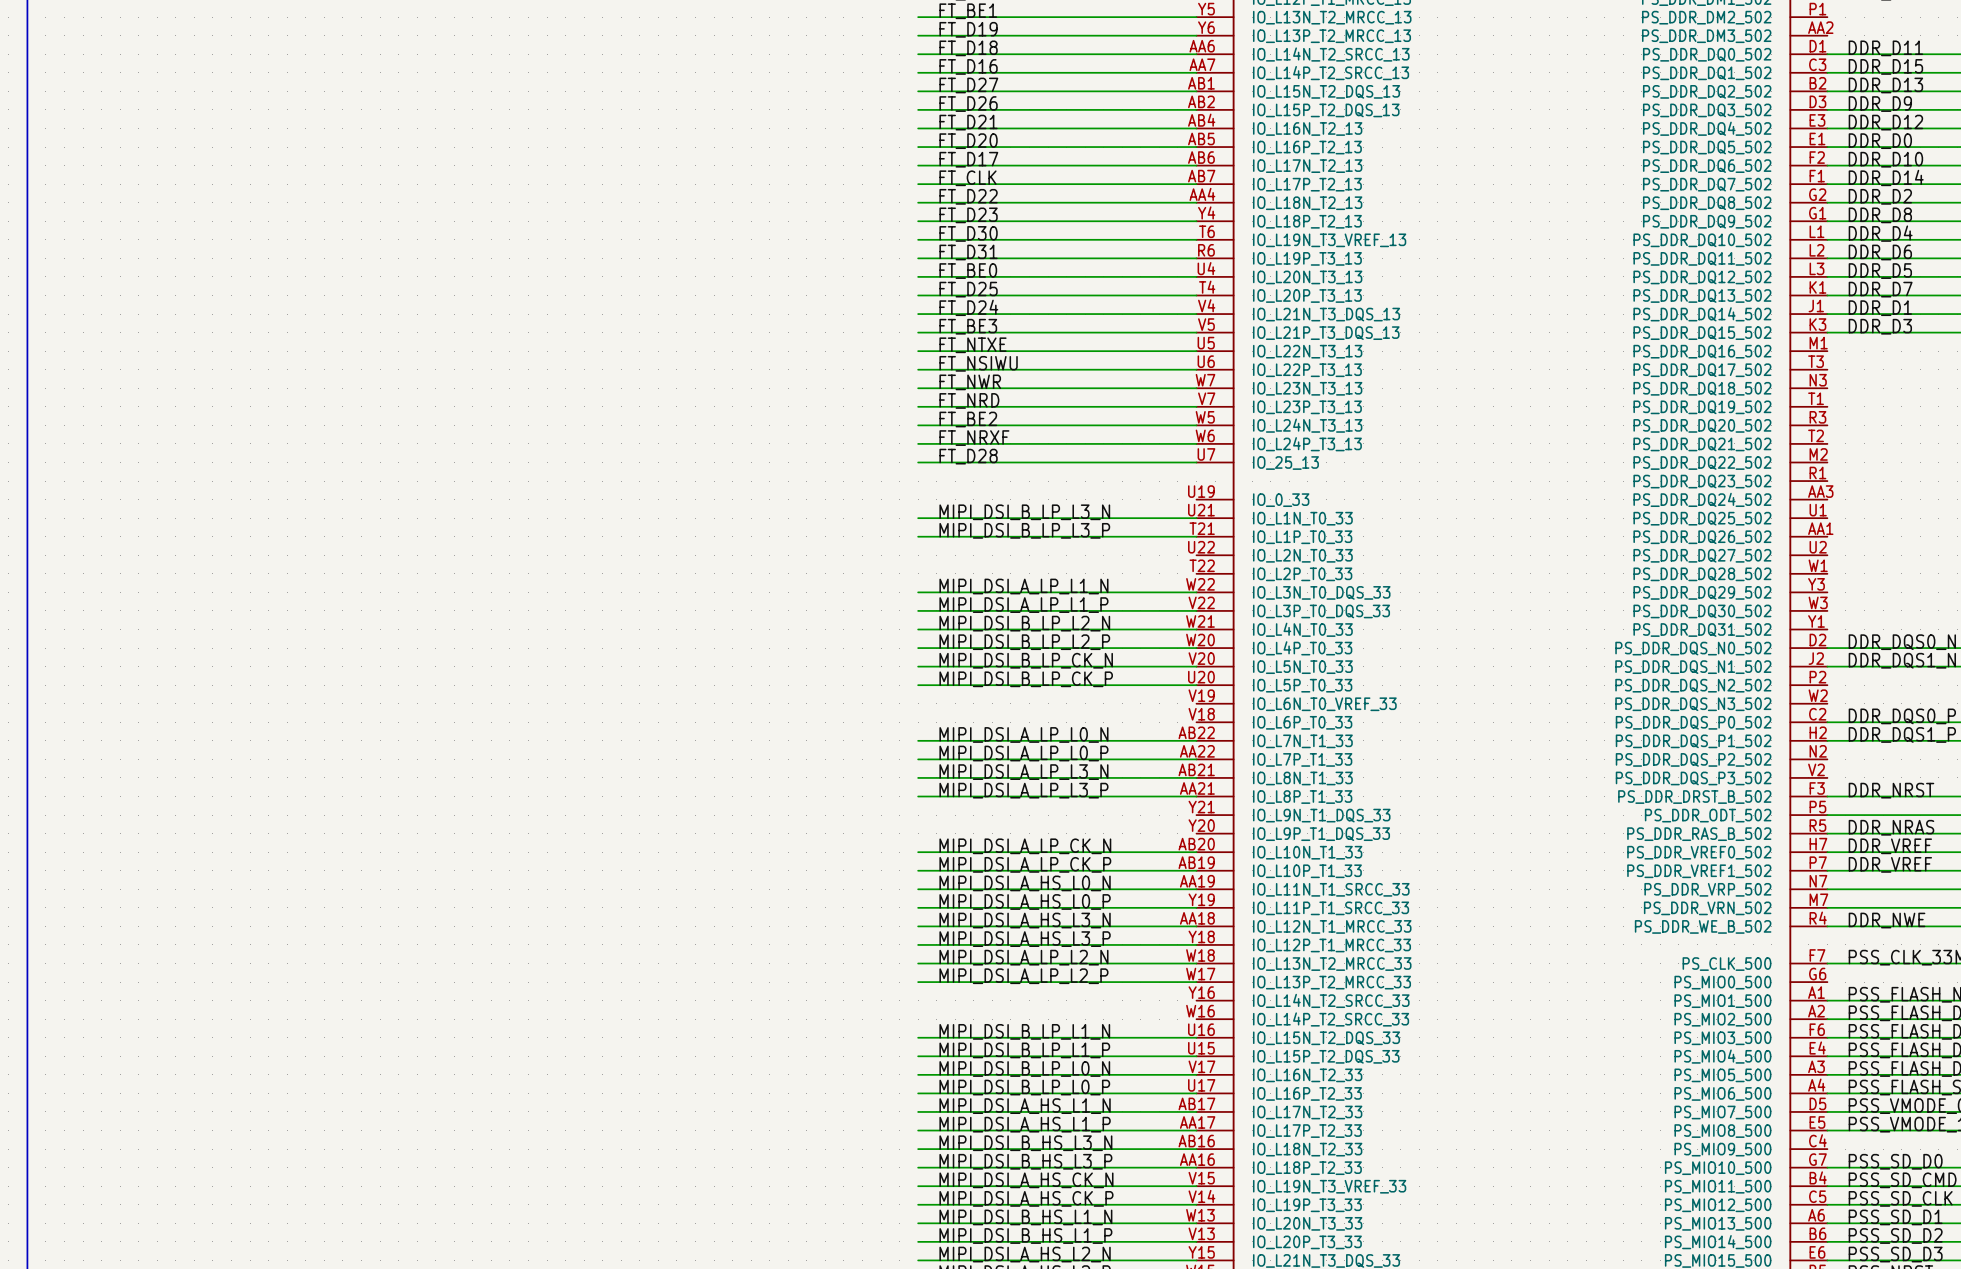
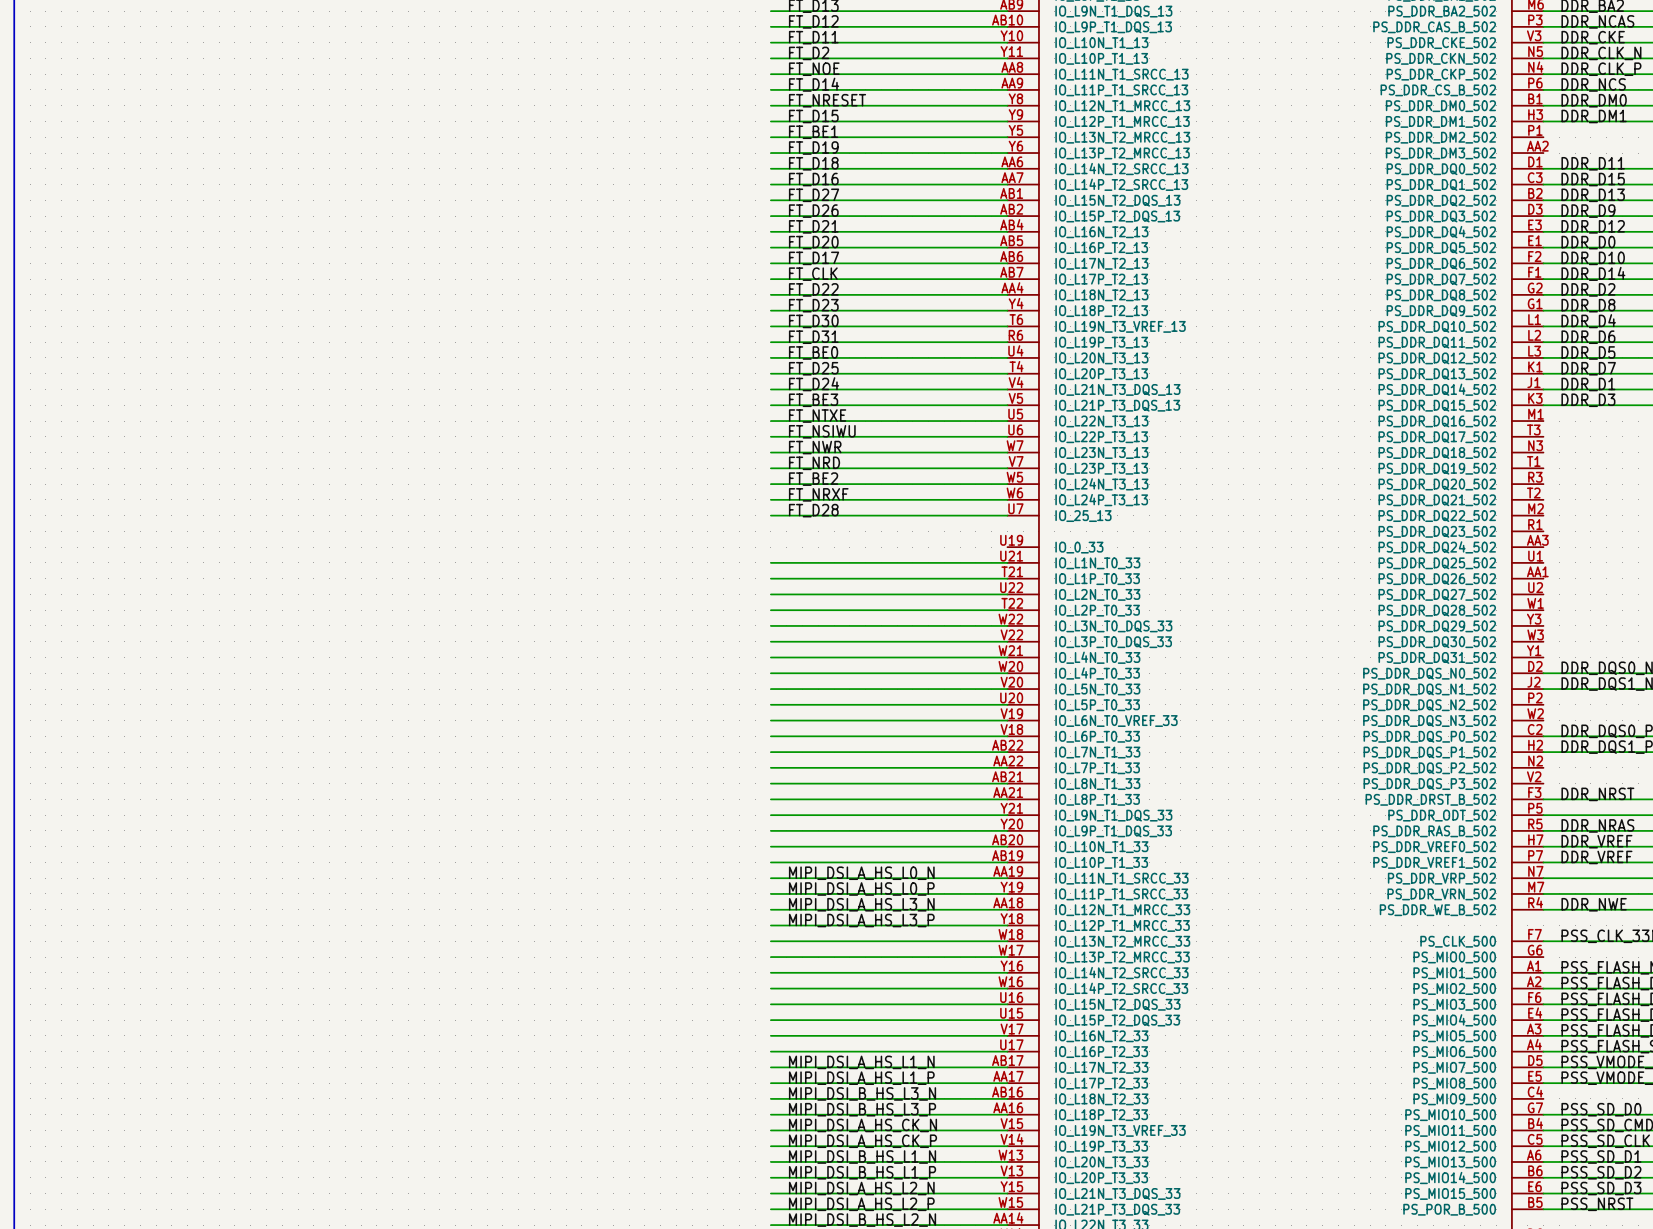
label: MIPI_DSI_B_LP_L3_N (1024, 512) -> none
label: MIPI_DSI_B_LP_L3_P (1024, 530) -> none
wire: none -> (770, 594) (1007, 594)
wire: none -> (770, 610) (1007, 610)
label: MIPI_DSI_A_LP_L1_N (1023, 586) -> none
label: MIPI_DSI_A_LP_L1_P (1023, 605) -> none
label: MIPI_DSI_B_LP_L2_N (1024, 623) -> none
label: MIPI_DSI_B_LP_L2_P (1024, 642) -> none
label: MIPI_DSI_B_LP_CK_N (1026, 660) -> none
label: MIPI_DSI_B_LP_CK_P (1026, 679) -> none
wire: none -> (770, 720) (1007, 720)
wire: none -> (770, 736) (1007, 736)
label: MIPI_DSI_A_LP_L0_N (1023, 734) -> none
label: MIPI_DSI_A_LP_L0_P (1023, 753) -> none
label: MIPI_DSI_A_LP_L3_N (1023, 772) -> none
label: MIPI_DSI_A_LP_L3_P (1023, 790) -> none
wire: none -> (770, 815) (1007, 815)
wire: none -> (770, 830) (1007, 830)
label: MIPI_DSI_A_LP_CK_N (1025, 846) -> none
label: MIPI_DSI_A_LP_CK_P (1025, 864) -> none
label: MIPI_DSI_A_LP_L2_N (1023, 957) -> none
label: MIPI_DSI_A_LP_L2_P (1023, 976) -> none
wire: none -> (770, 972) (1007, 972)
wire: none -> (770, 988) (1007, 988)
label: MIPI_DSI_B_LP_L1_N (1024, 1031) -> none
label: MIPI_DSI_B_LP_L1_P (1024, 1050) -> none
label: MIPI_DSI_B_LP_L0_N (1024, 1068) -> none
label: MIPI_DSI_B_LP_L0_P (1024, 1087) -> none

